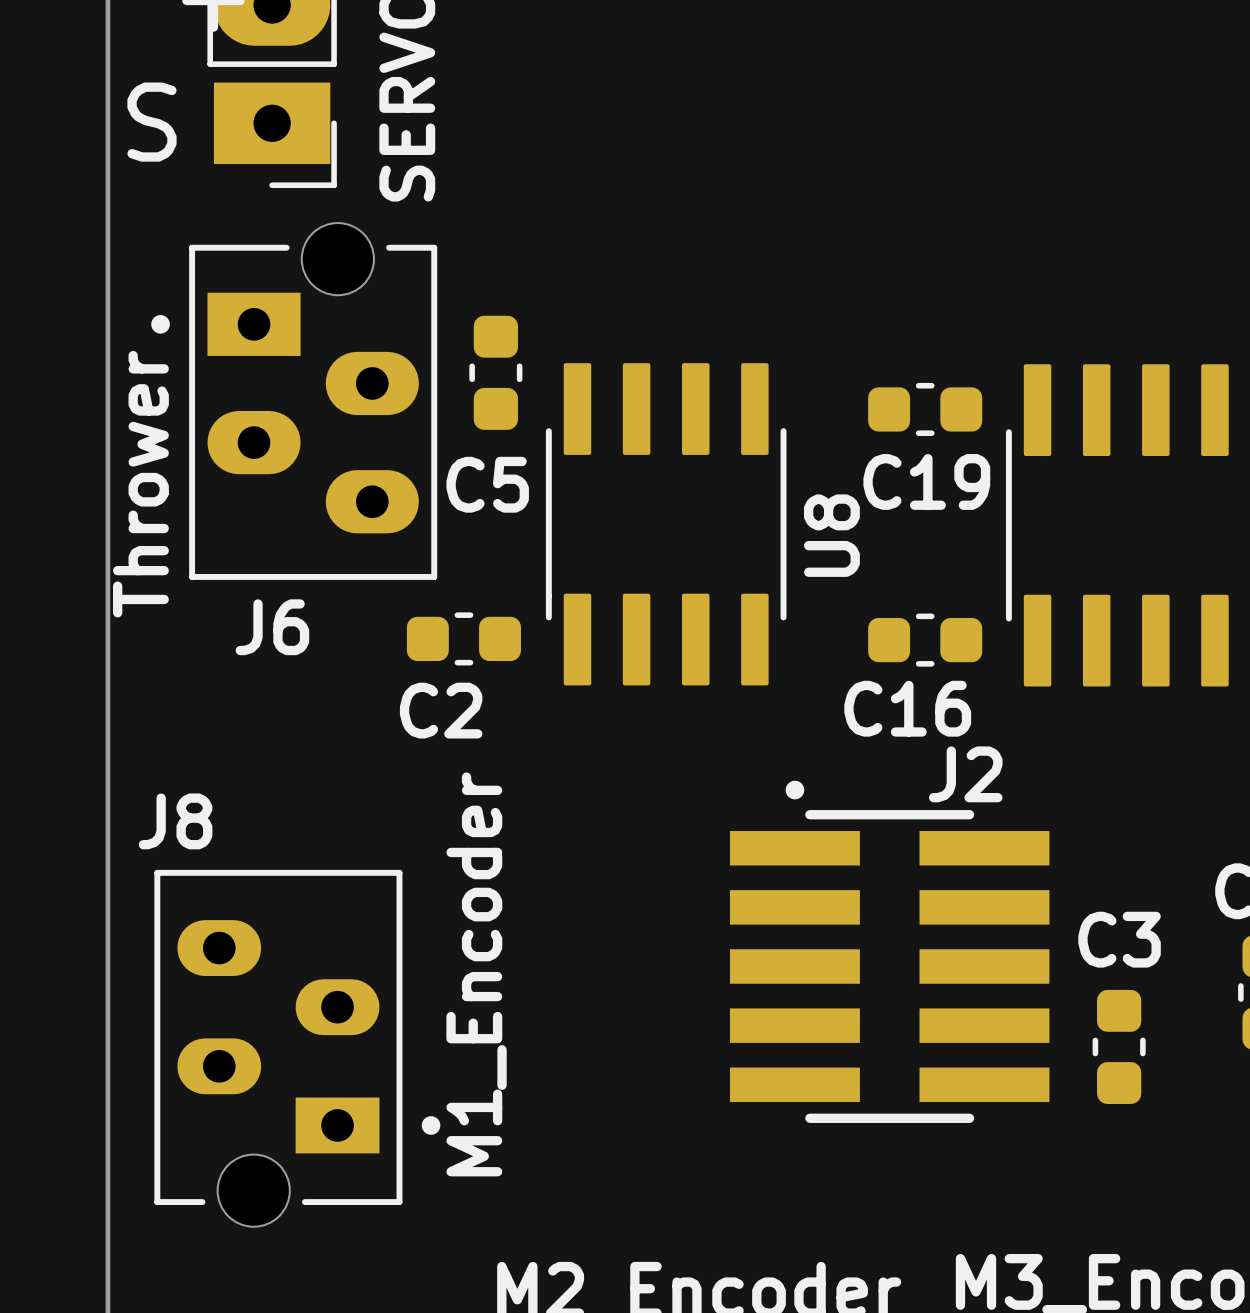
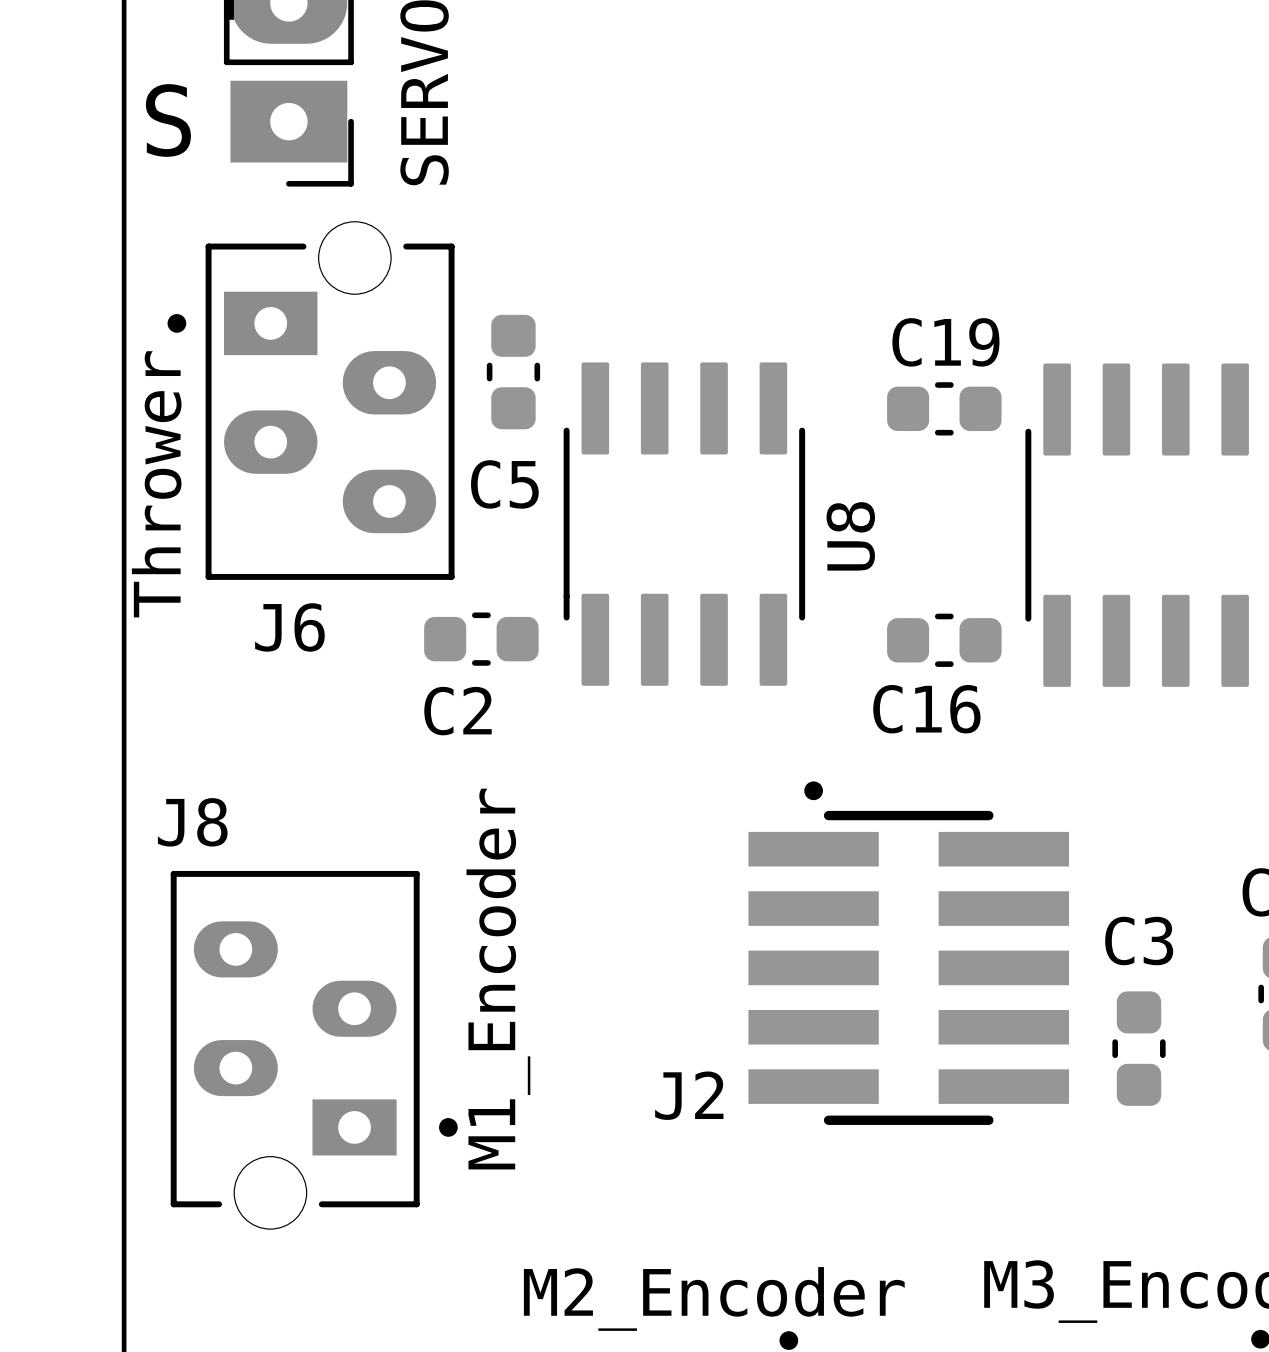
C19 name position: C19 (926, 481) -> C19 (945, 342)
J2 name position: J2 (965, 774) -> J2 (689, 1095)

